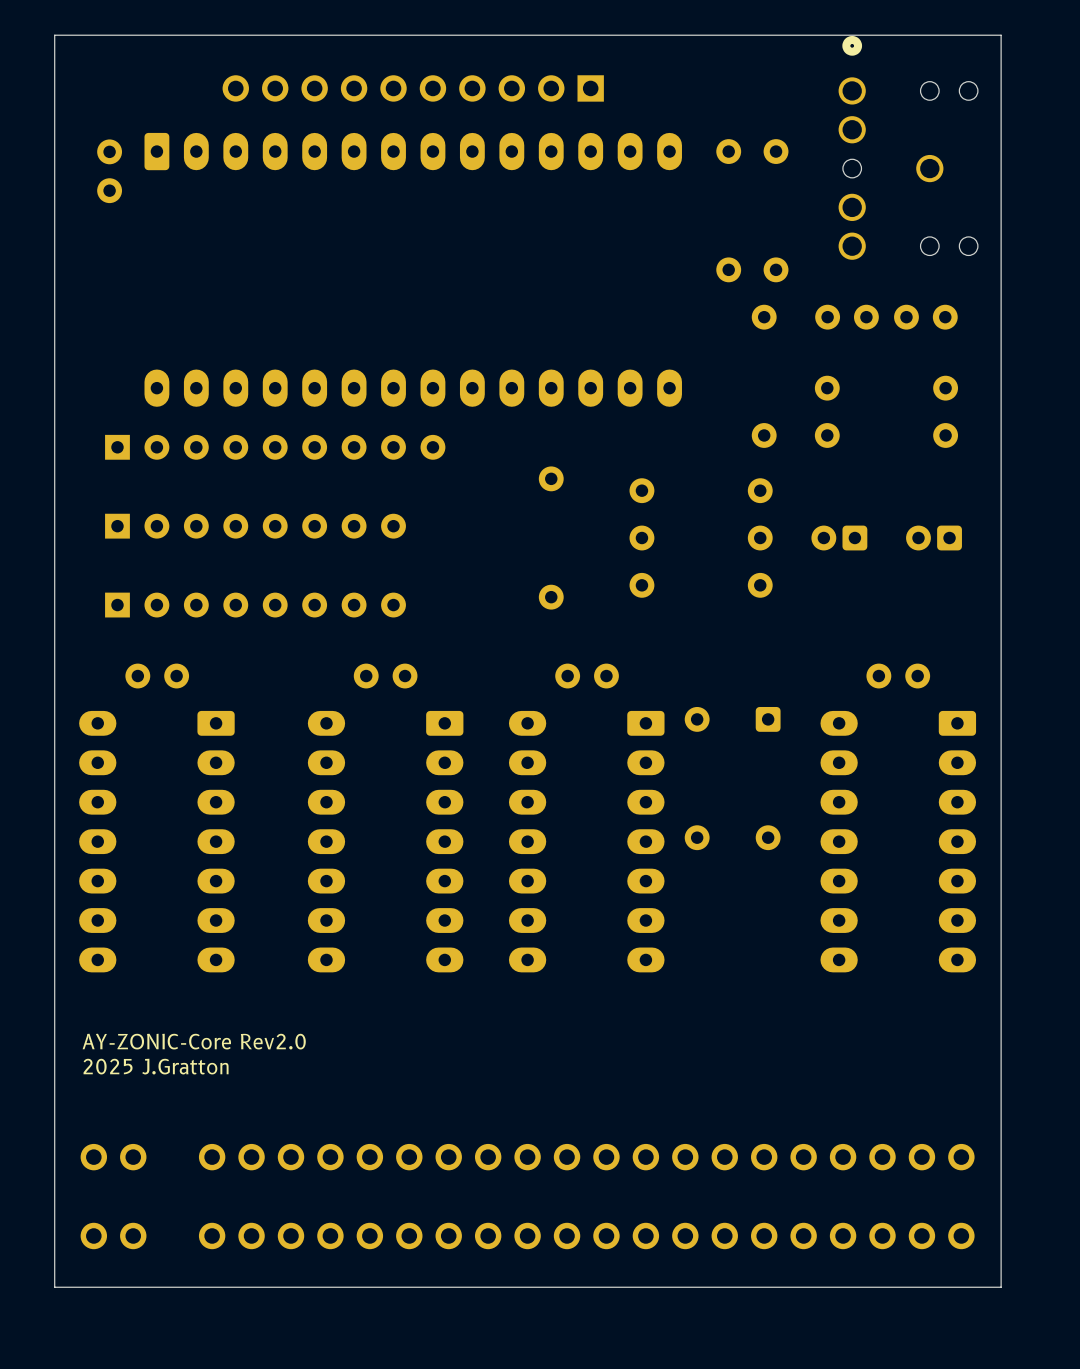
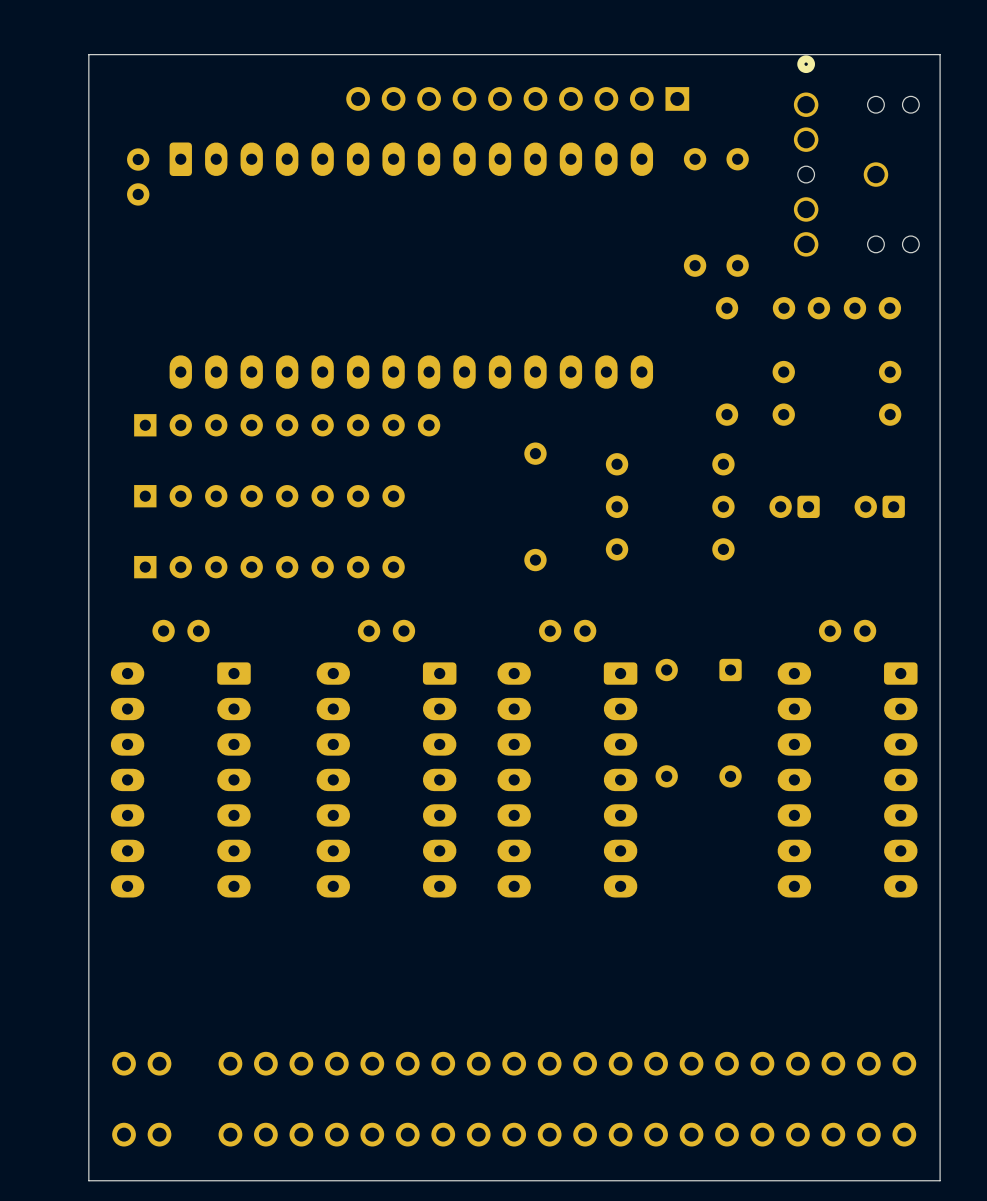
part position: (413, 88) -> (517, 98)
text: AY-ZONIC-Core Rev2.0 (194, 1041) -> none
text: 2025 J.Gratton (156, 1066) -> none

